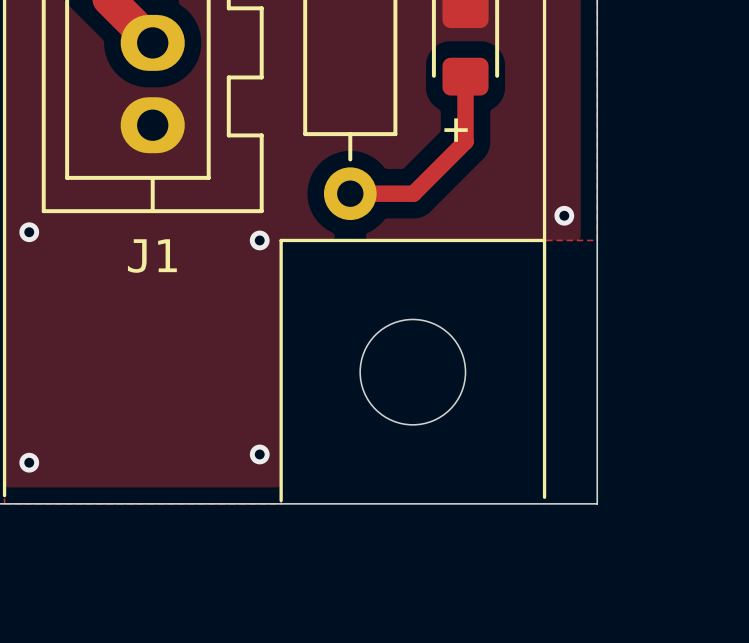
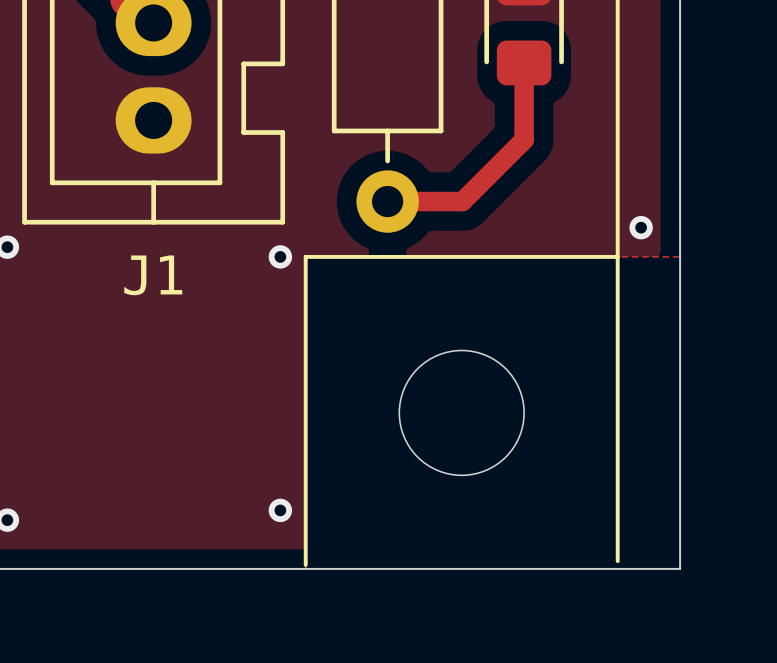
text: + (456, 130) -> none

